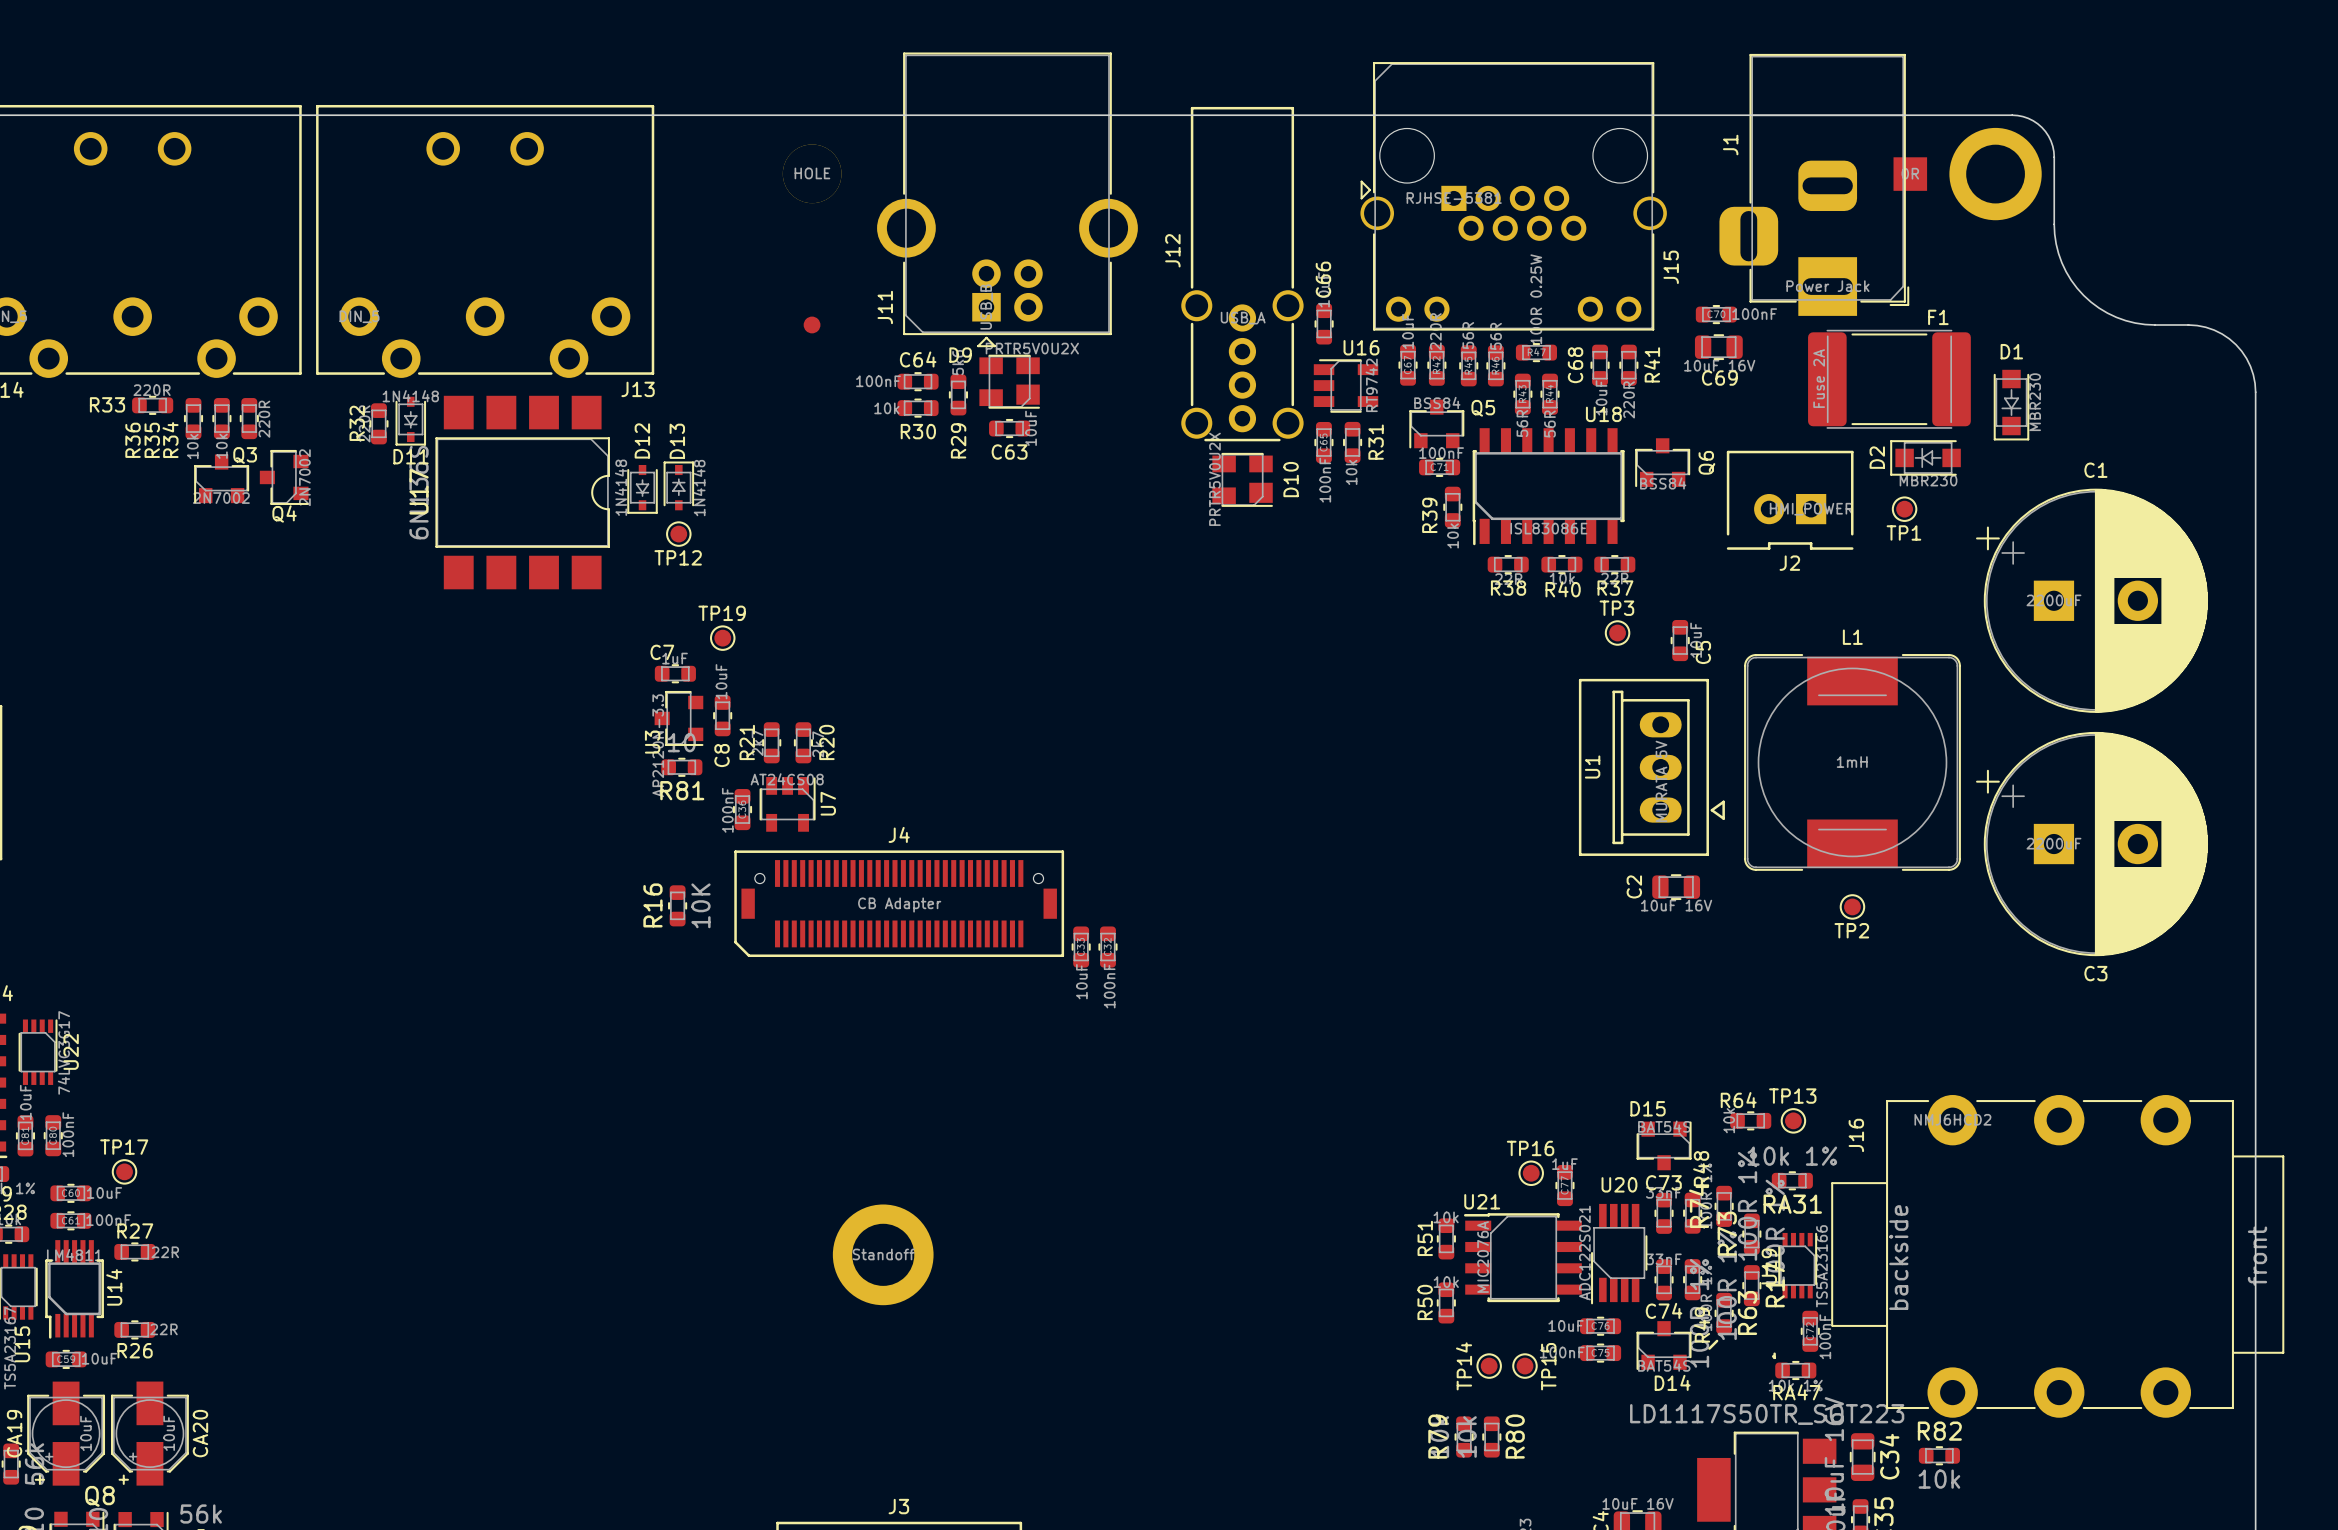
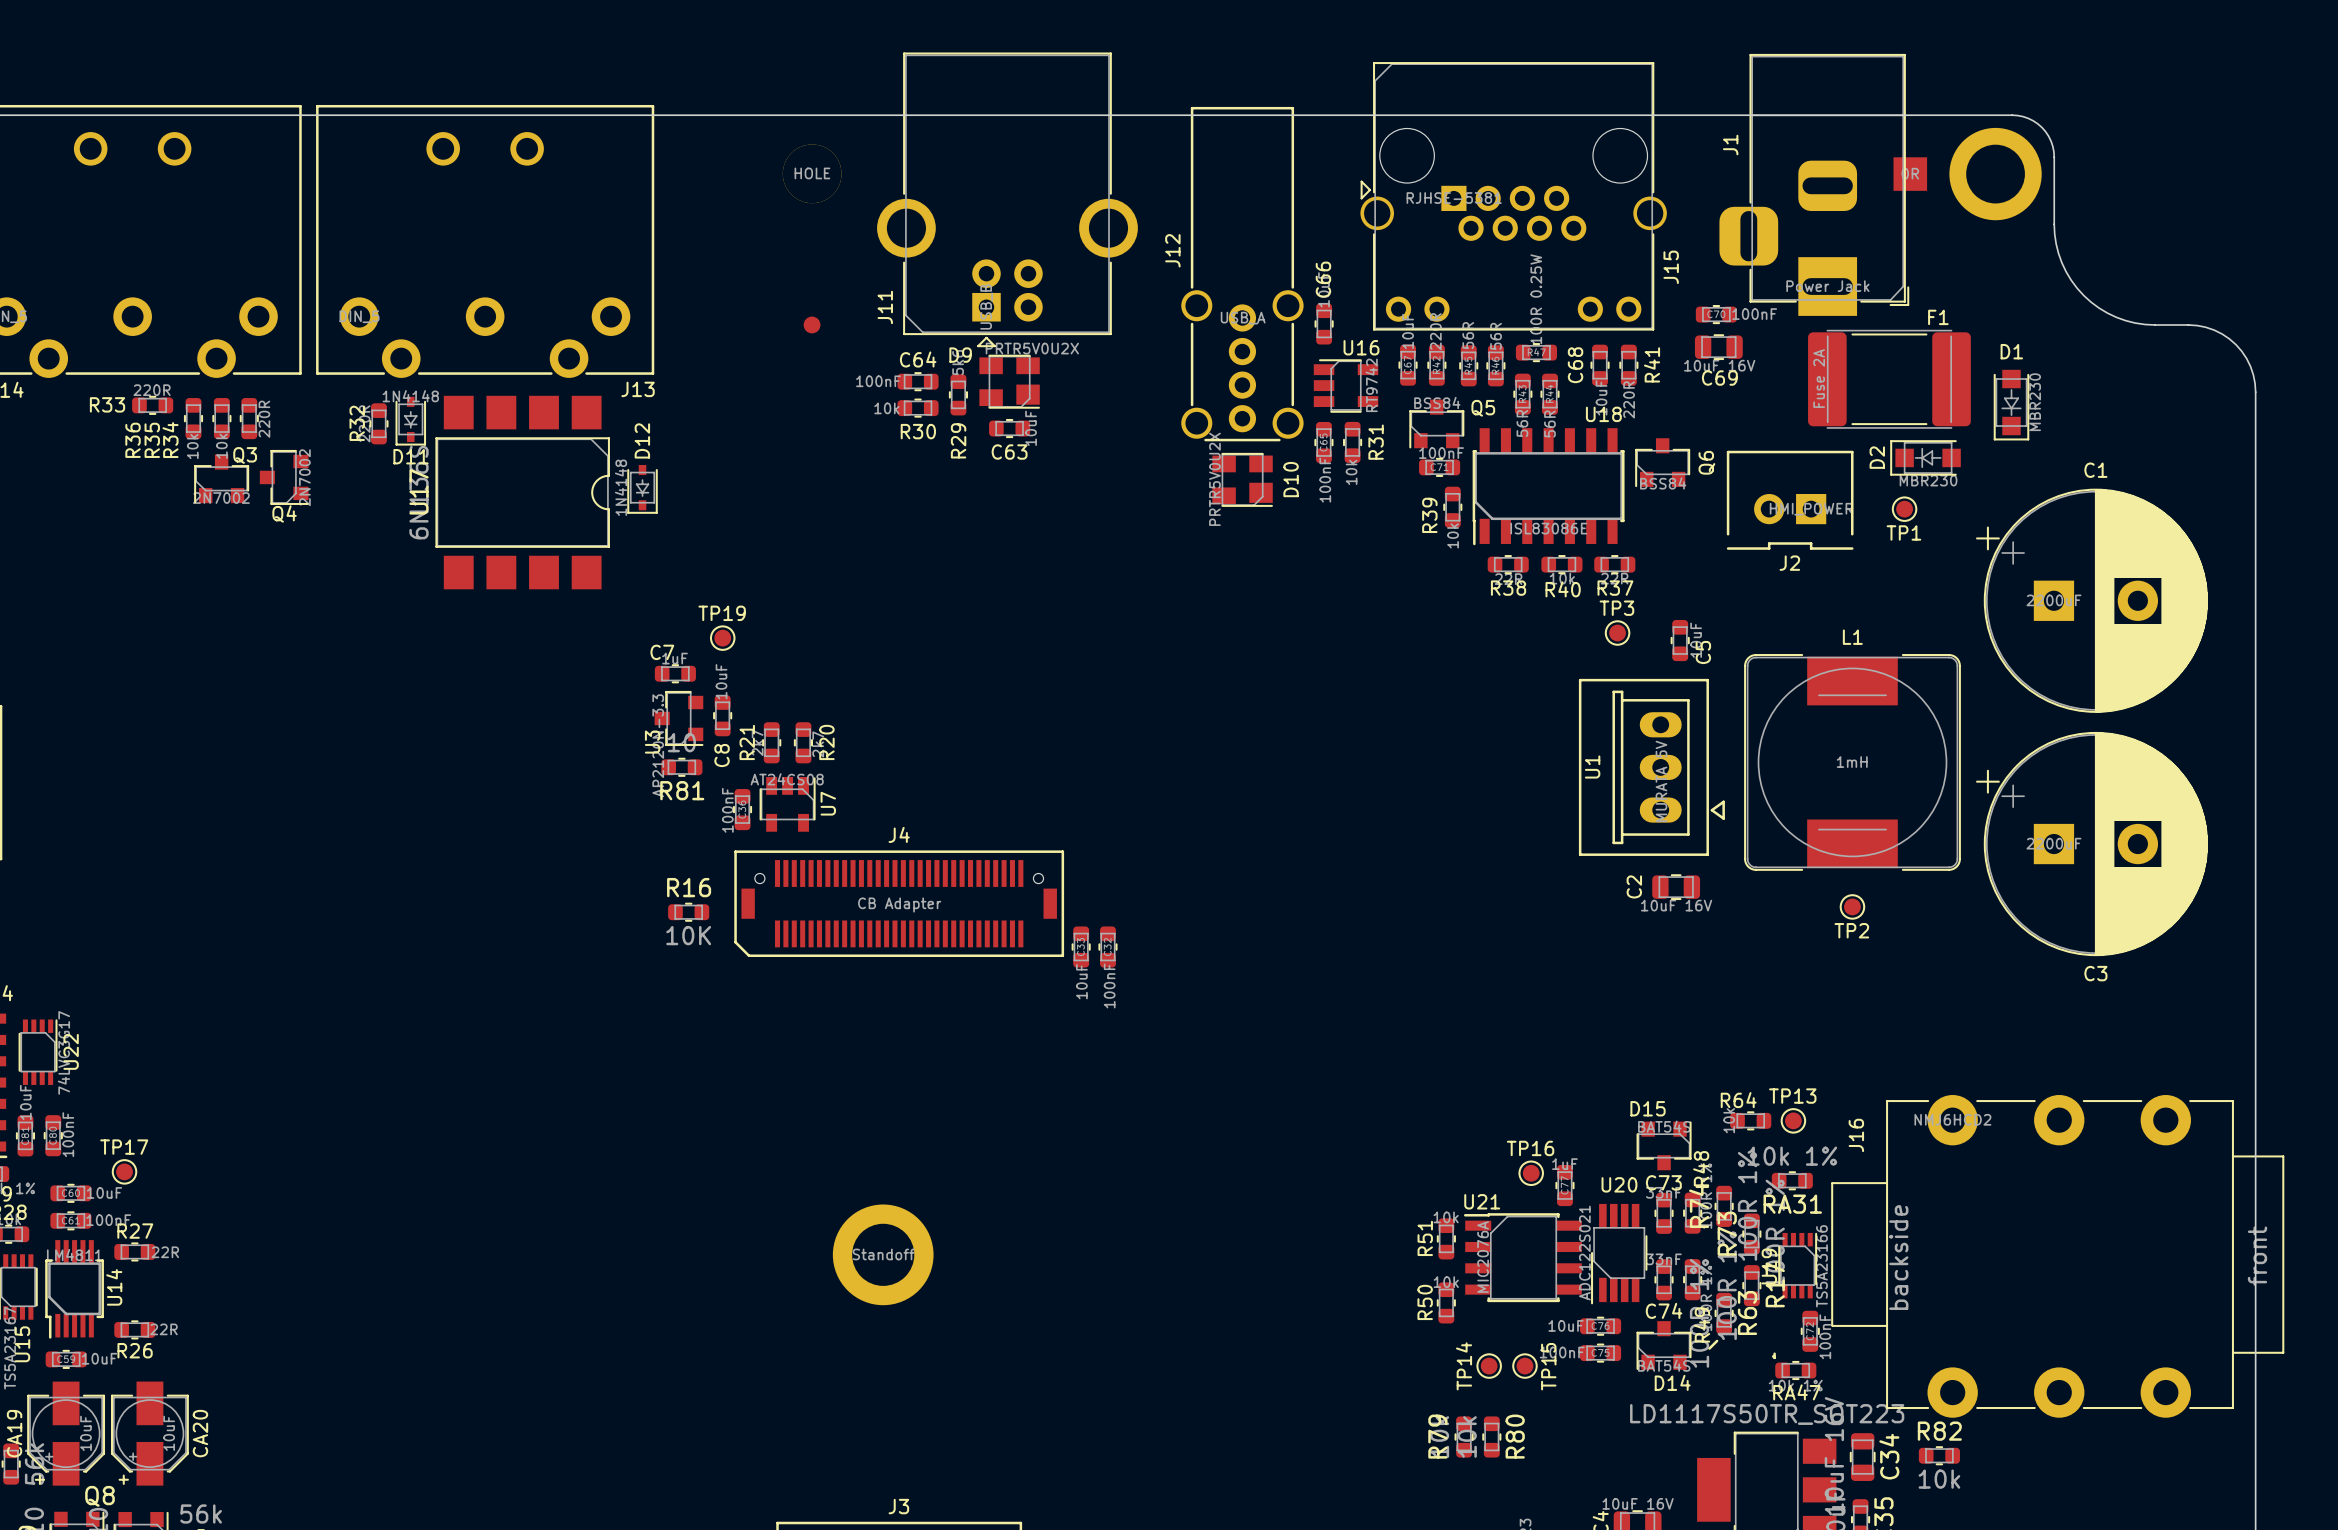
D13: 1N4148 (678, 485) -> none
TP12: (678, 534) -> none
R16 rotation: 0° (677, 905) -> 90° clockwise (688, 912)

